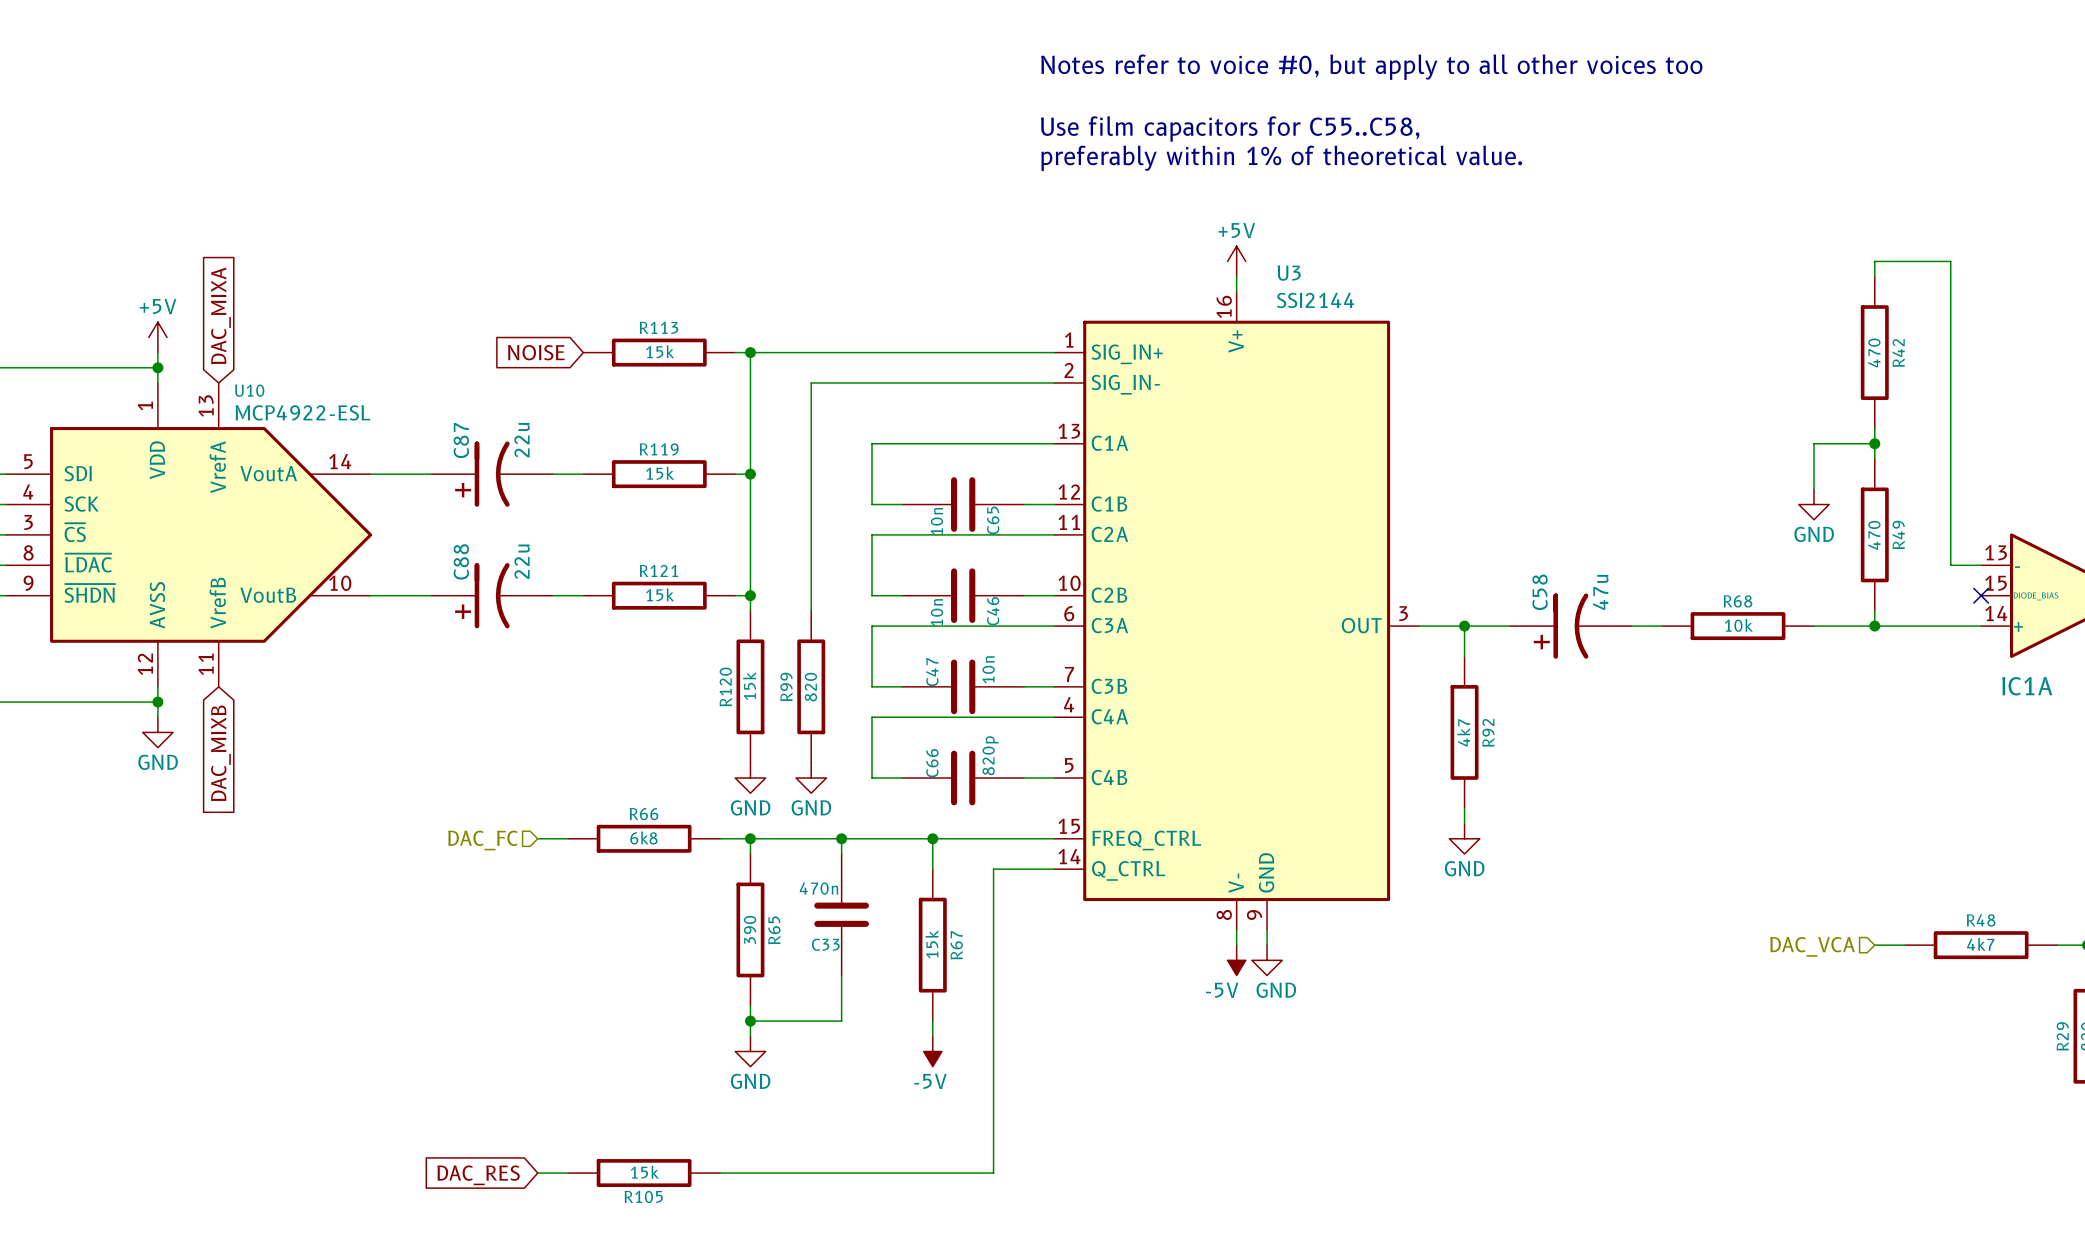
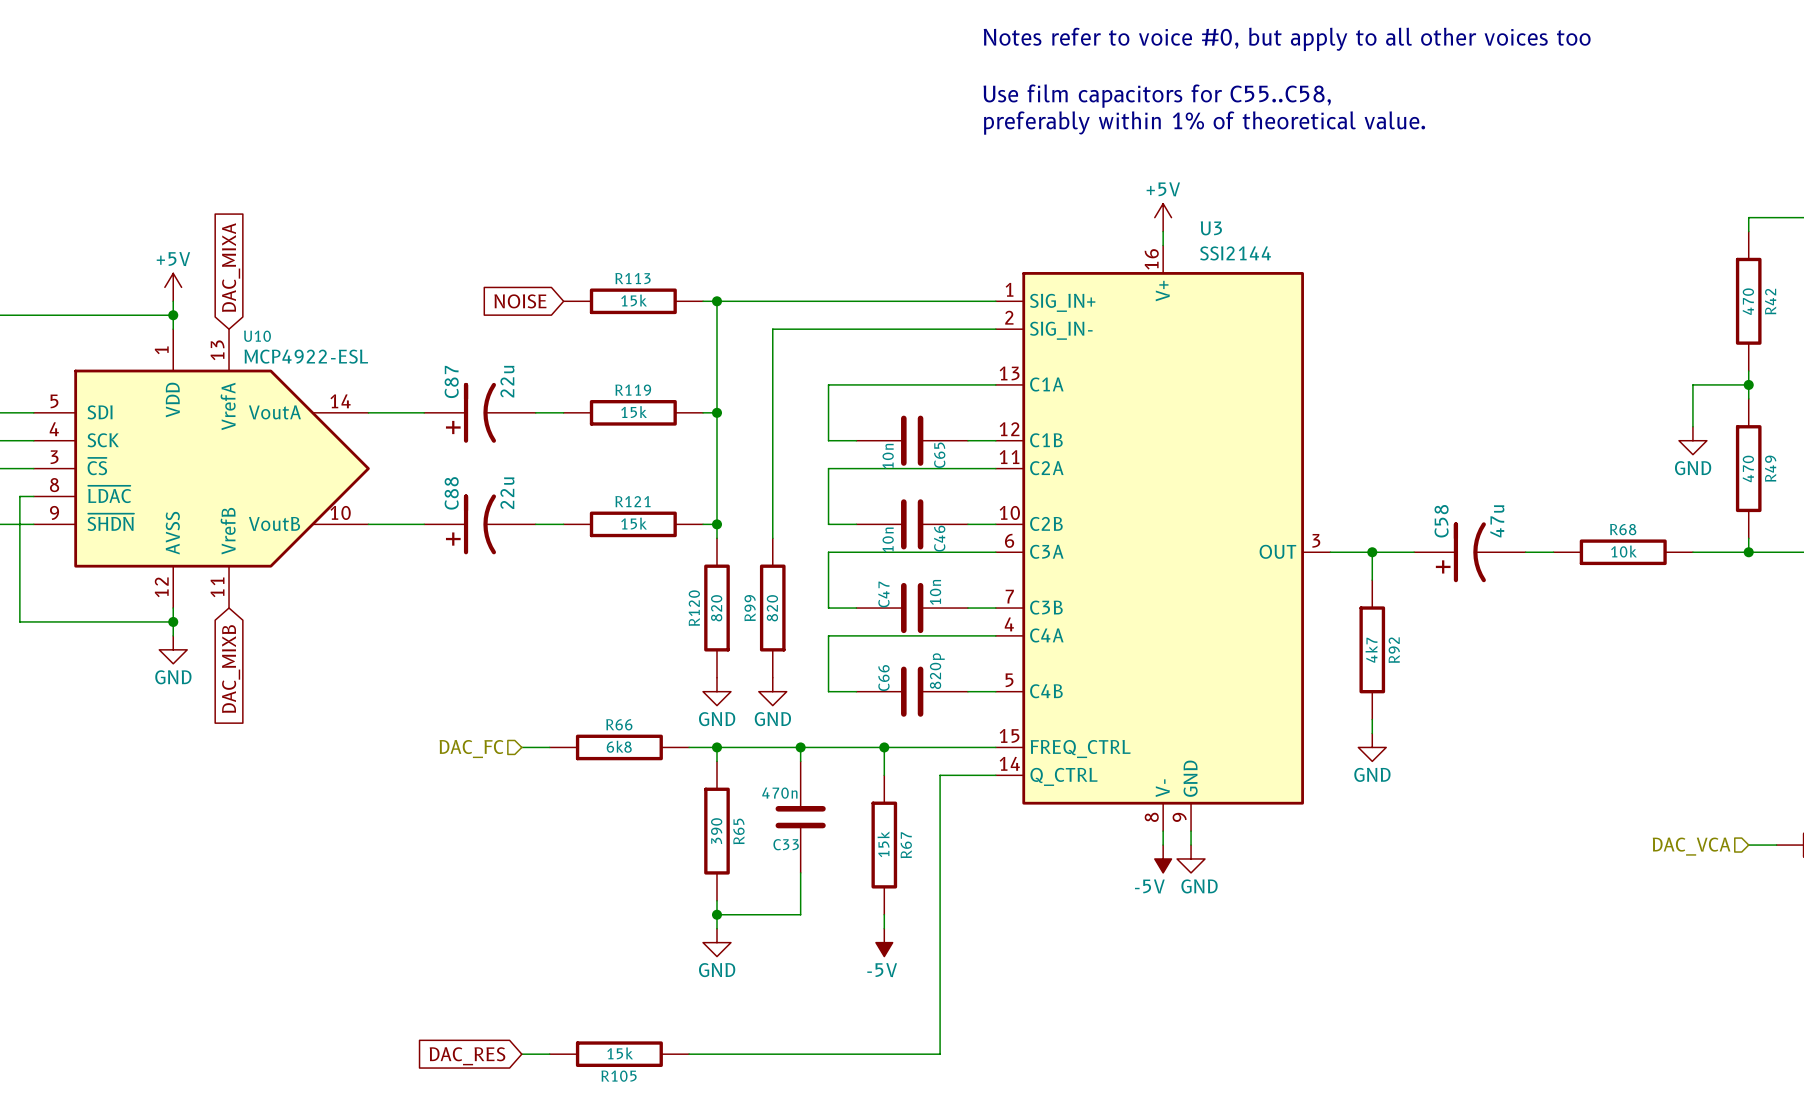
R120 value: 15k (749, 686) -> 820 (716, 608)

